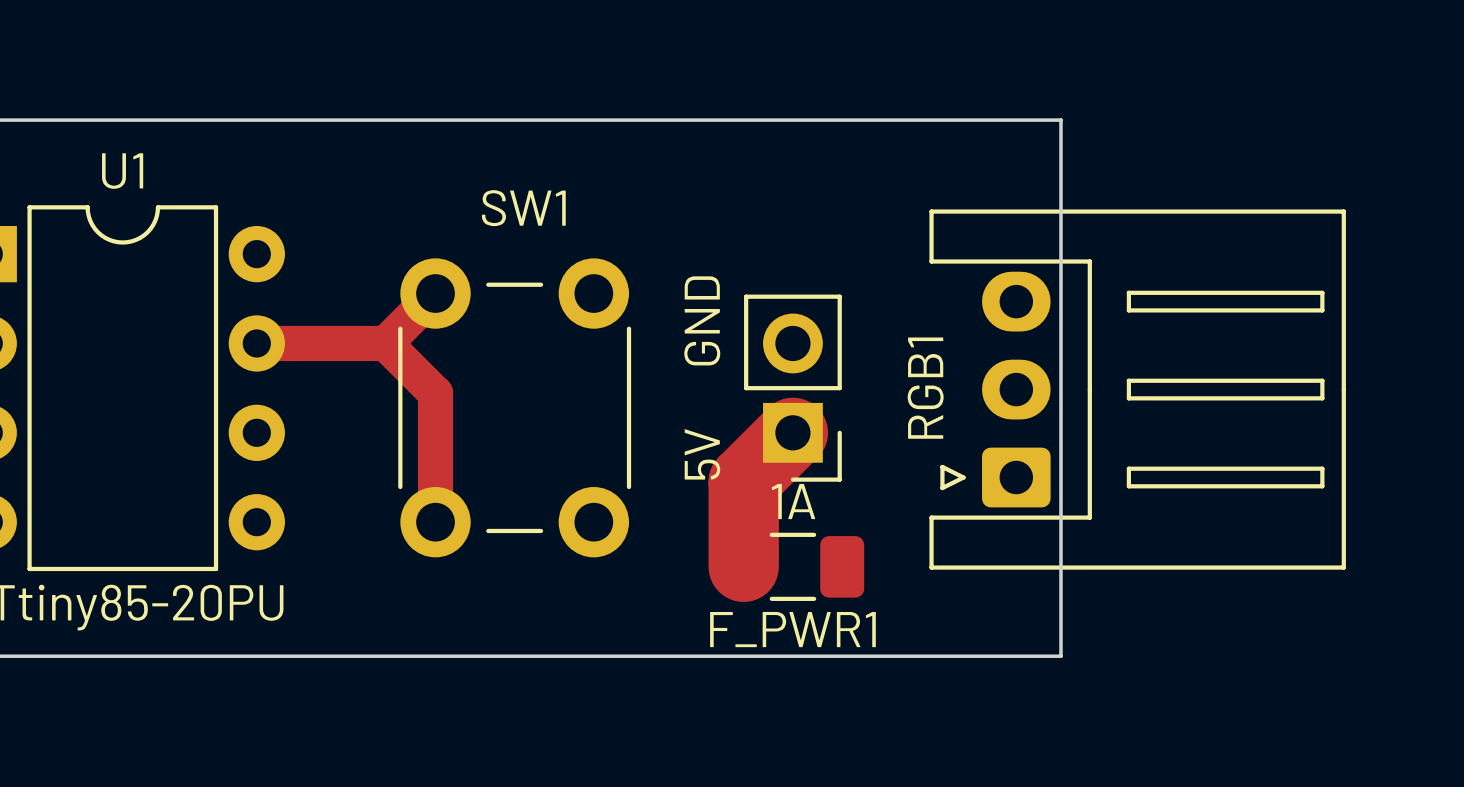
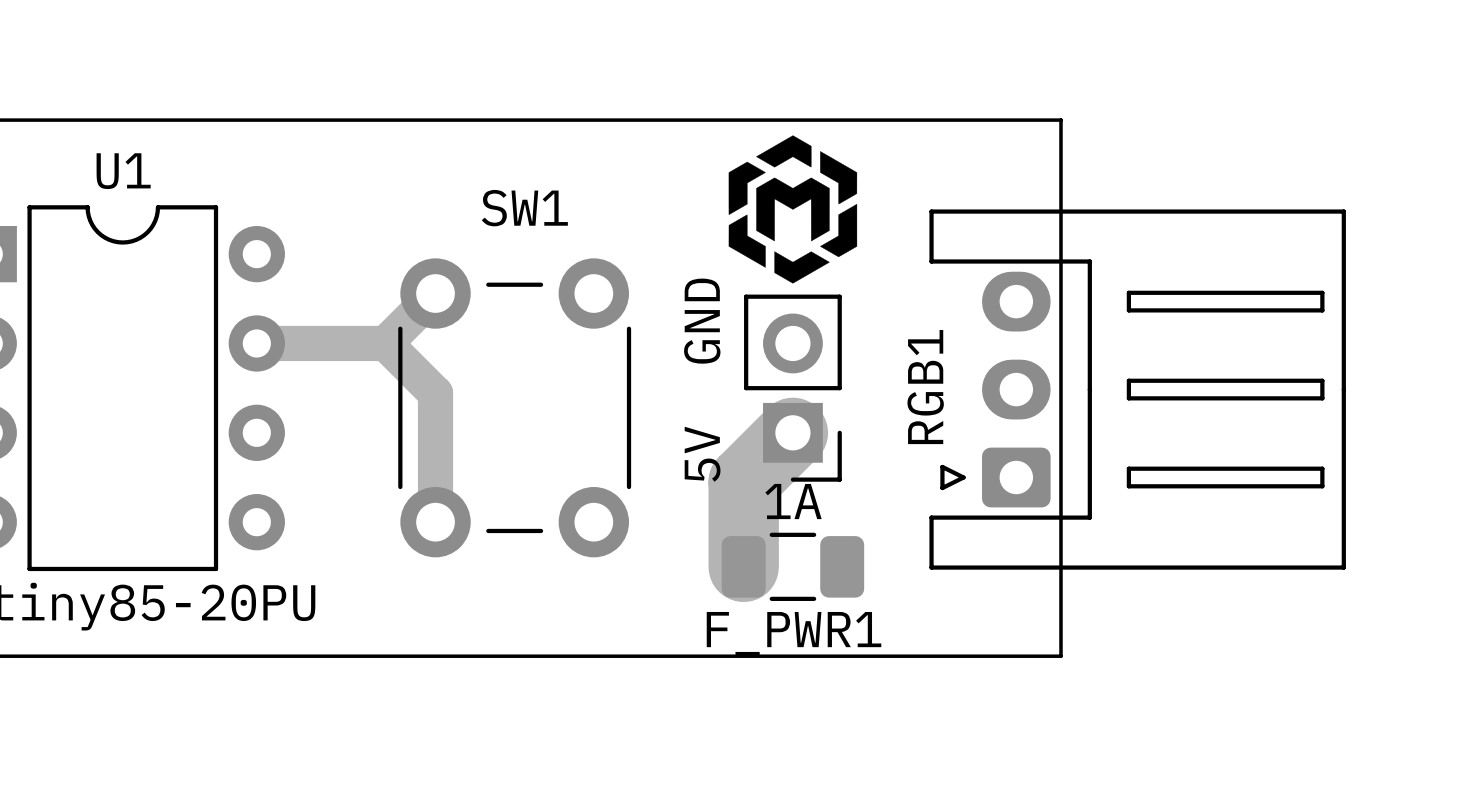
drawing: none -> [728, 135, 858, 284]

